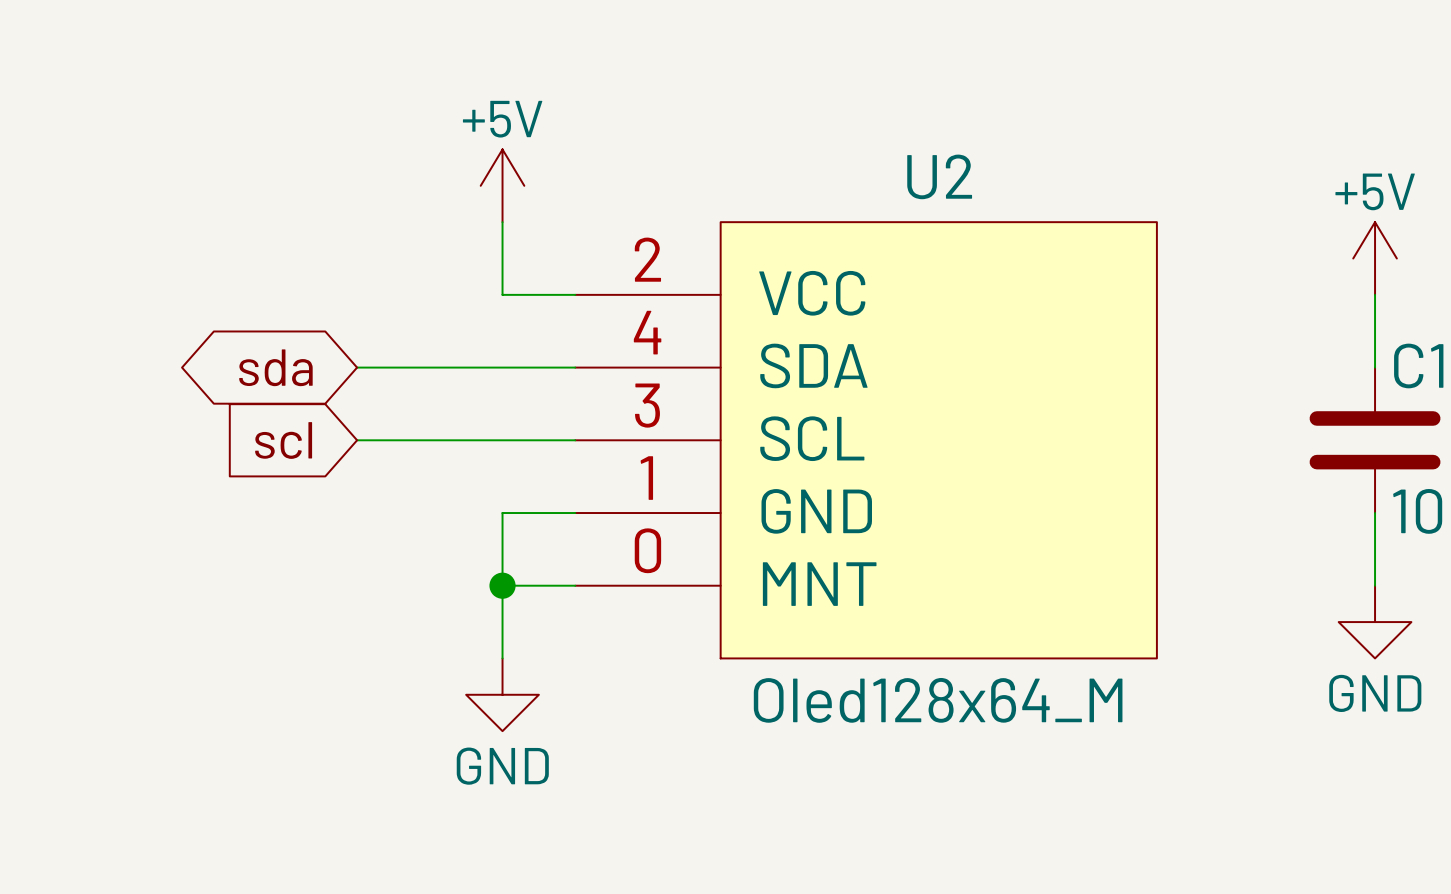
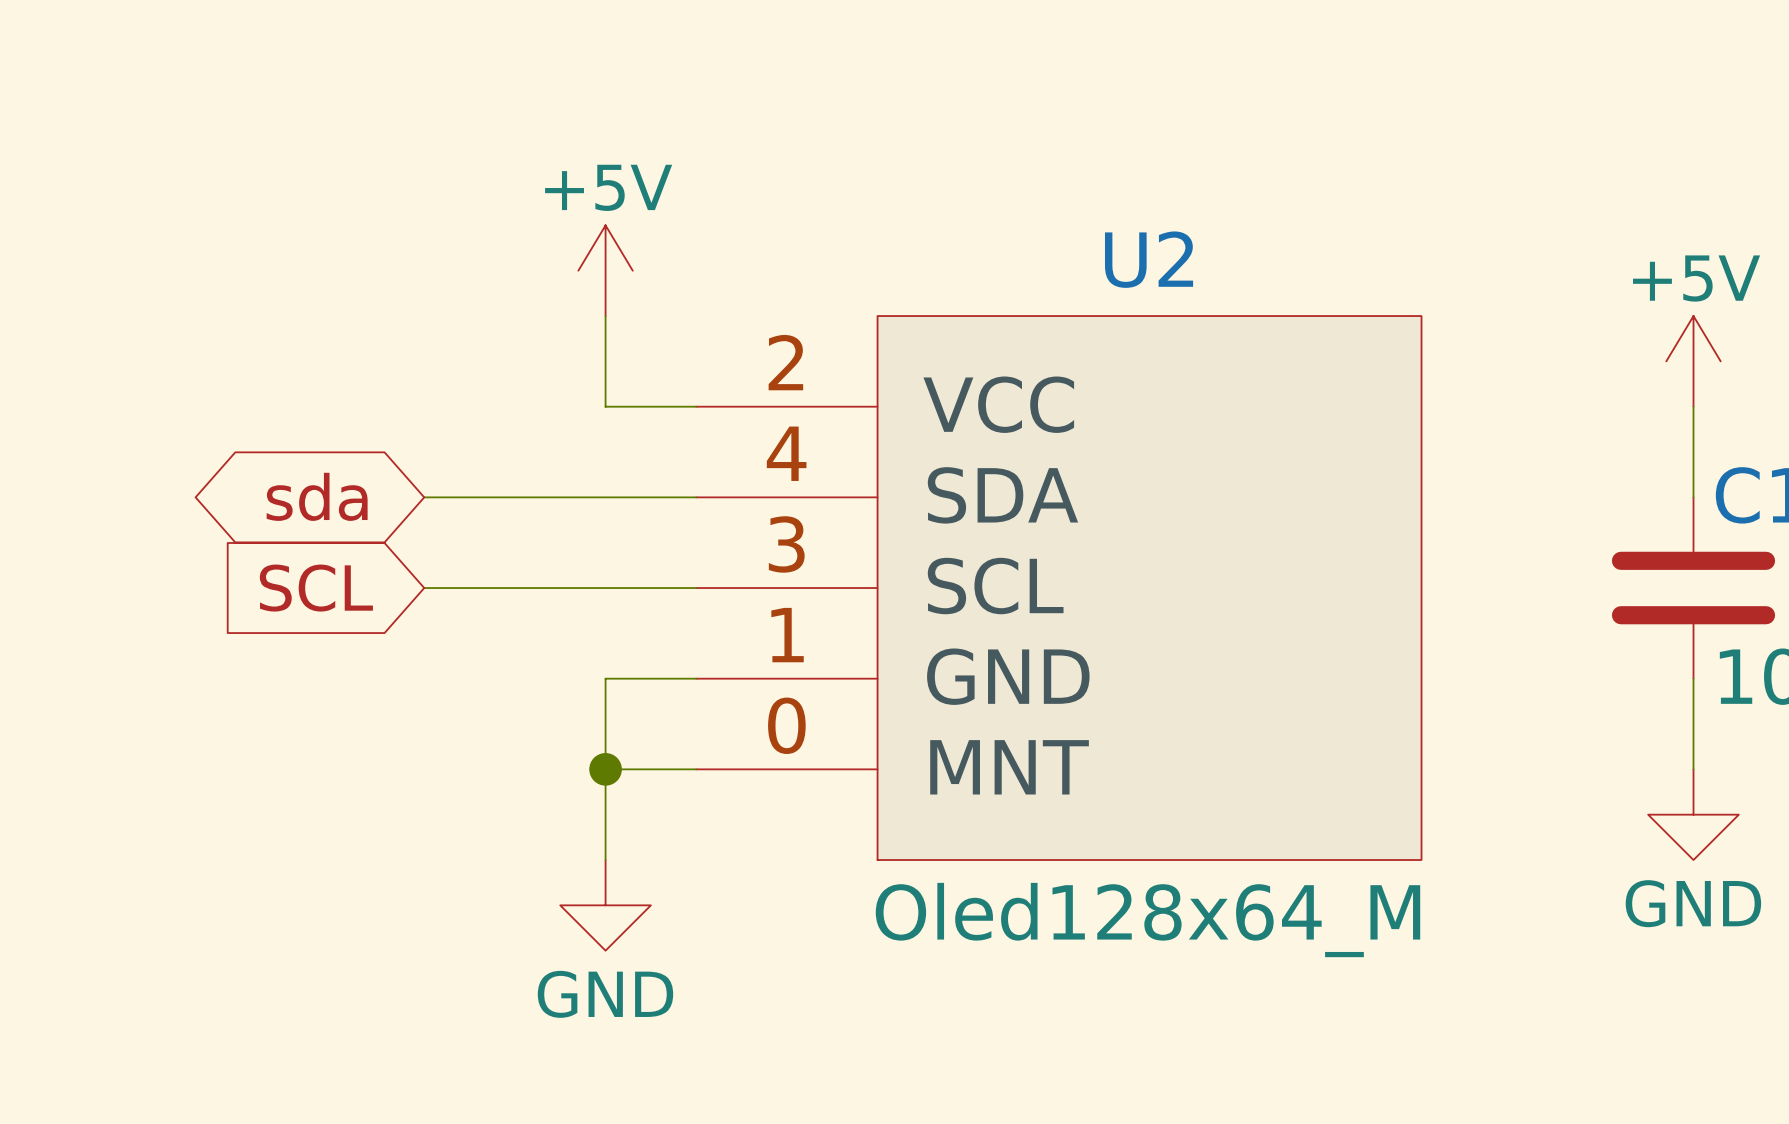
global label: scl (283, 440) -> SCL (316, 588)

